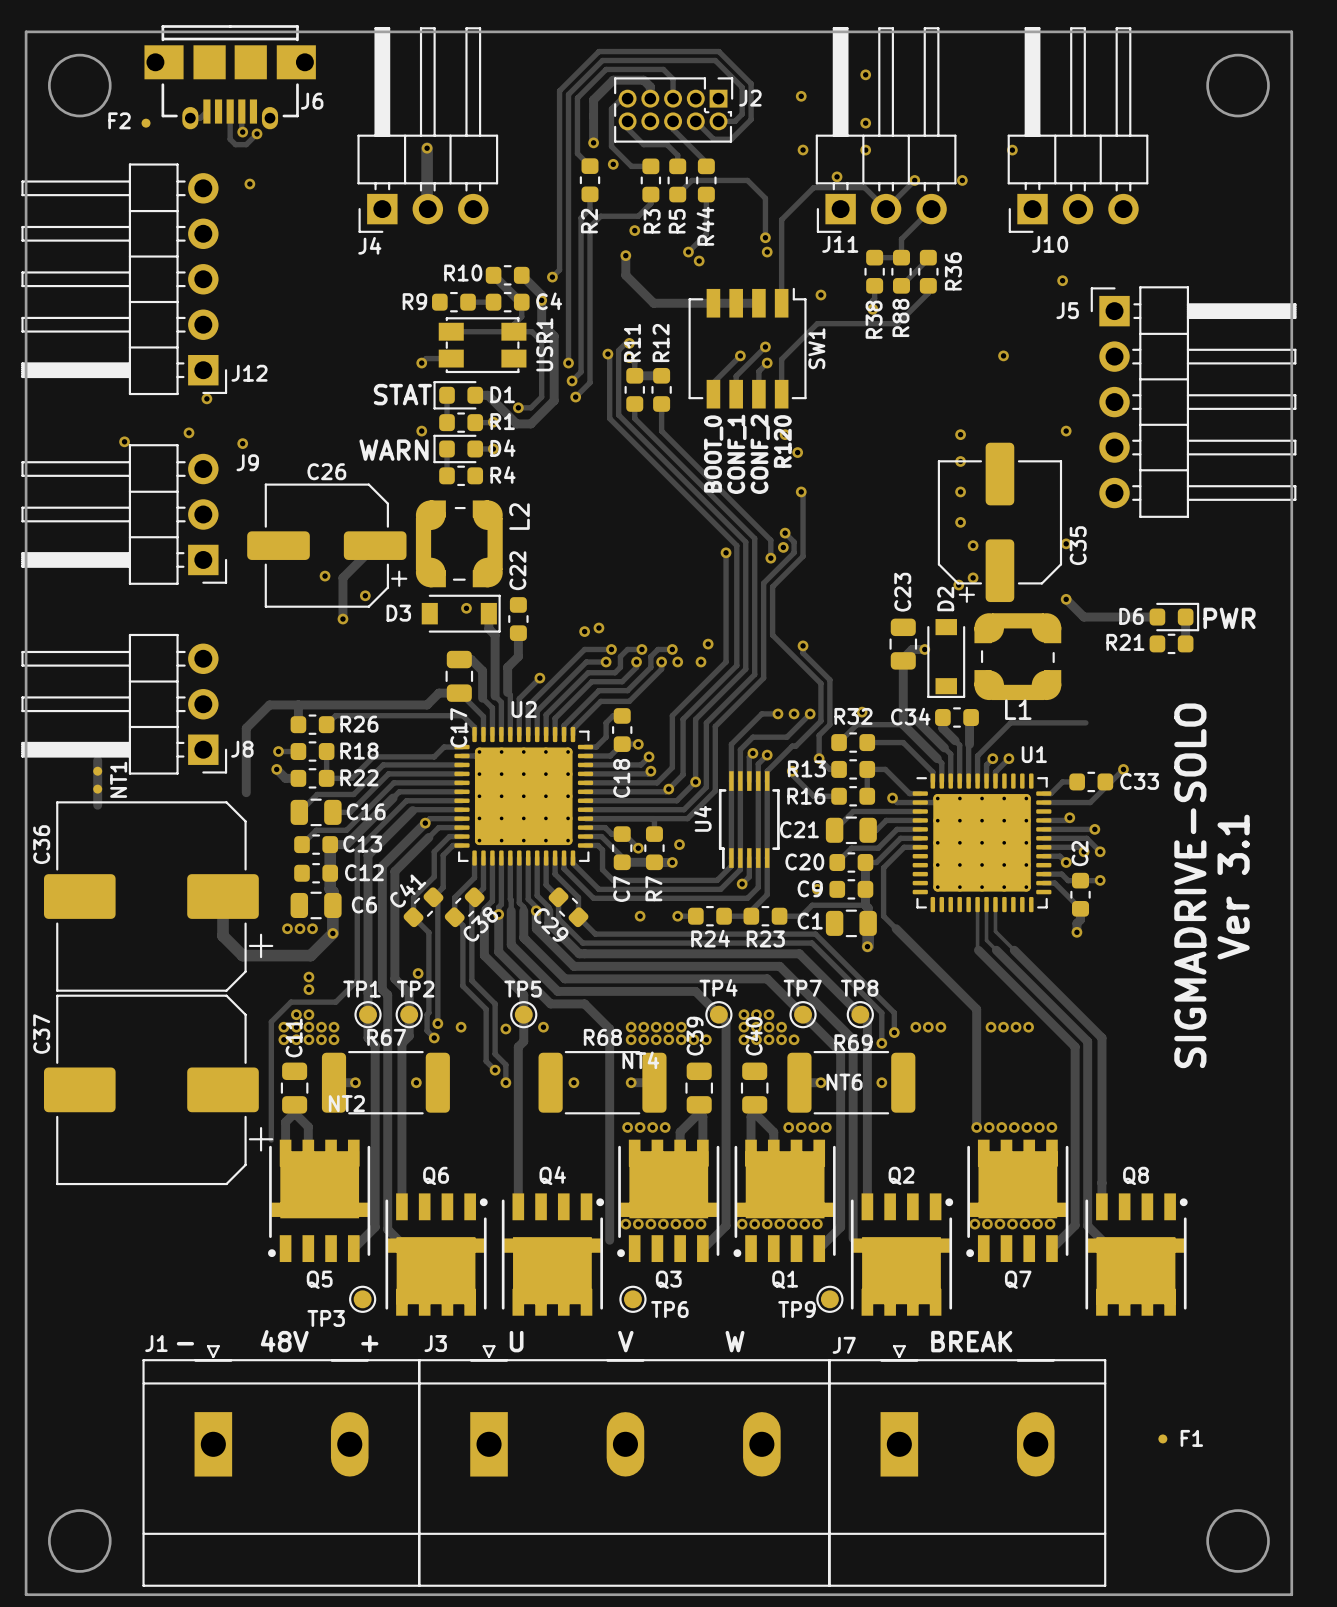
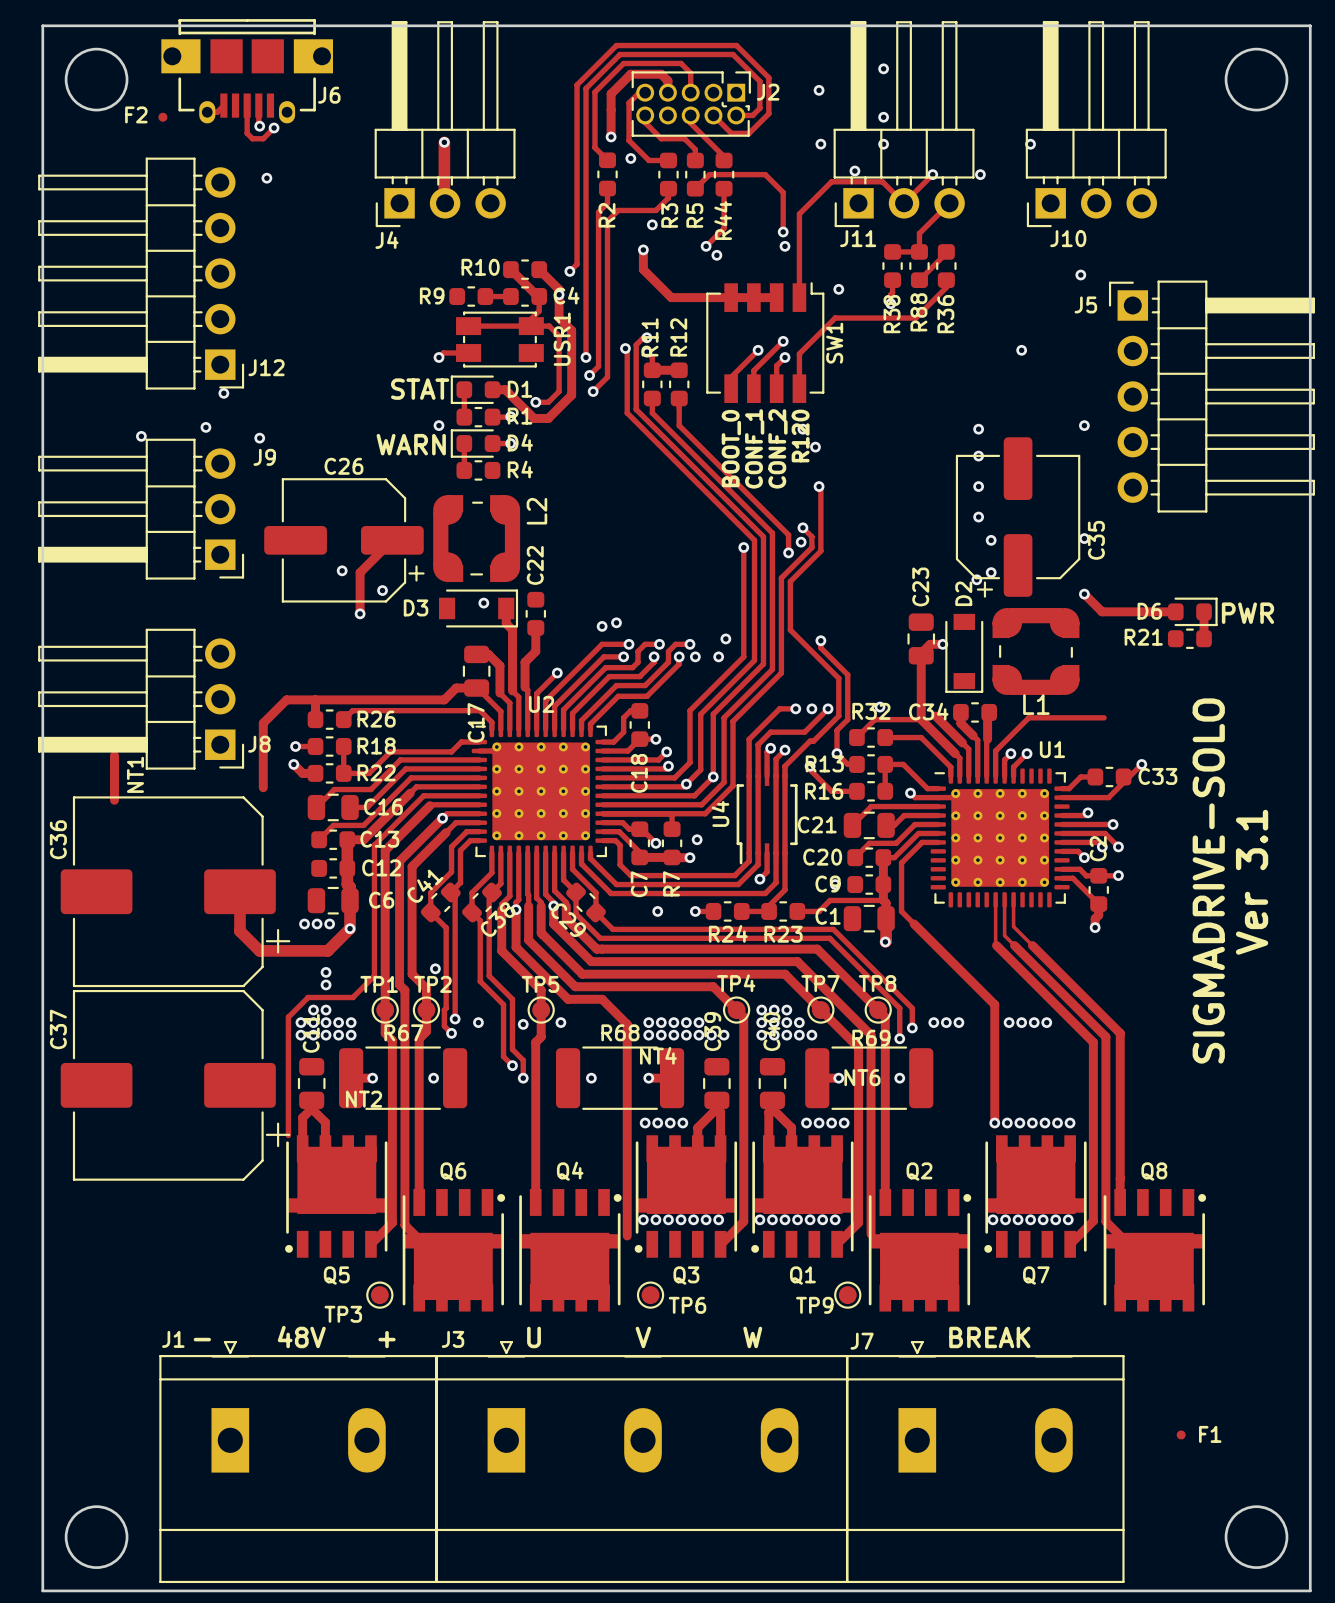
R36 name position: R36 (953, 271) -> R36 (945, 314)

